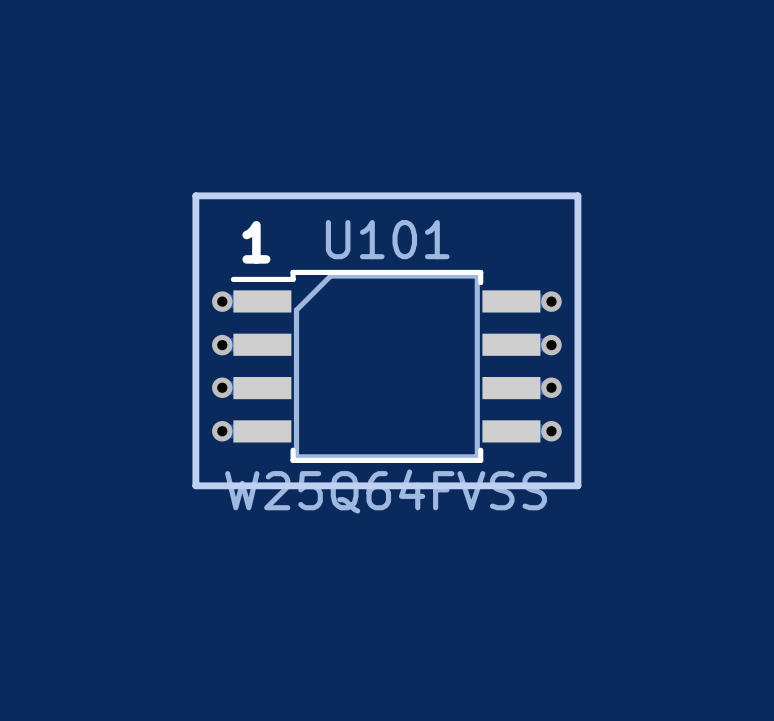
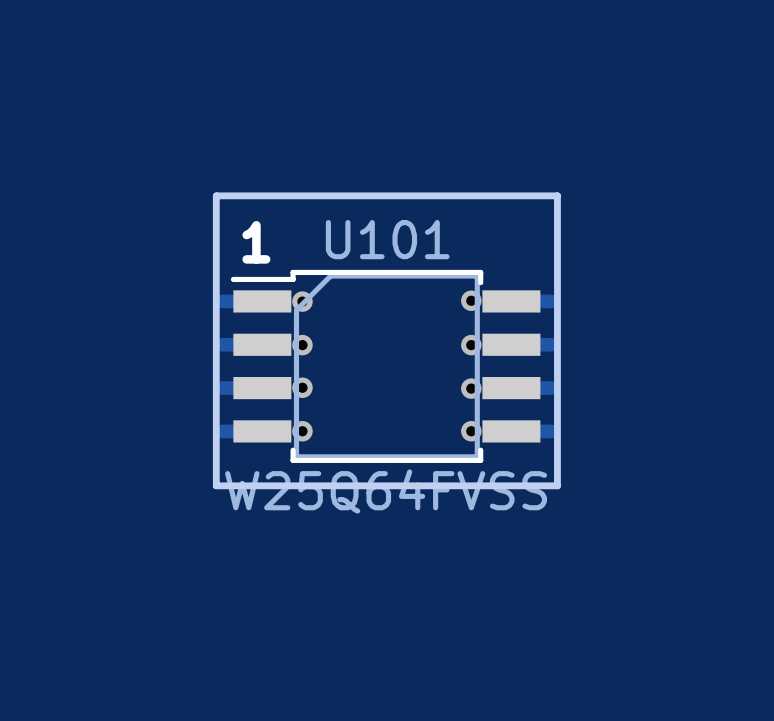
board edge: (216, 195) (195, 195) (195, 485) (216, 485) -> (216, 195) (216, 485)
board edge: (557, 195) (577, 195) (577, 485) (557, 485) -> (557, 195) (557, 485)
via: none -> (471, 300)
via: (222, 301) -> none
via: none -> (302, 301)
via: (551, 301) -> none
via: (222, 345) -> none
via: none -> (302, 345)
via: none -> (471, 345)
via: (551, 345) -> none
via: (222, 387) -> none
via: none -> (302, 387)
via: (551, 387) -> none
via: none -> (471, 388)
via: (222, 431) -> none
via: none -> (302, 431)
via: none -> (471, 431)
via: (551, 431) -> none

